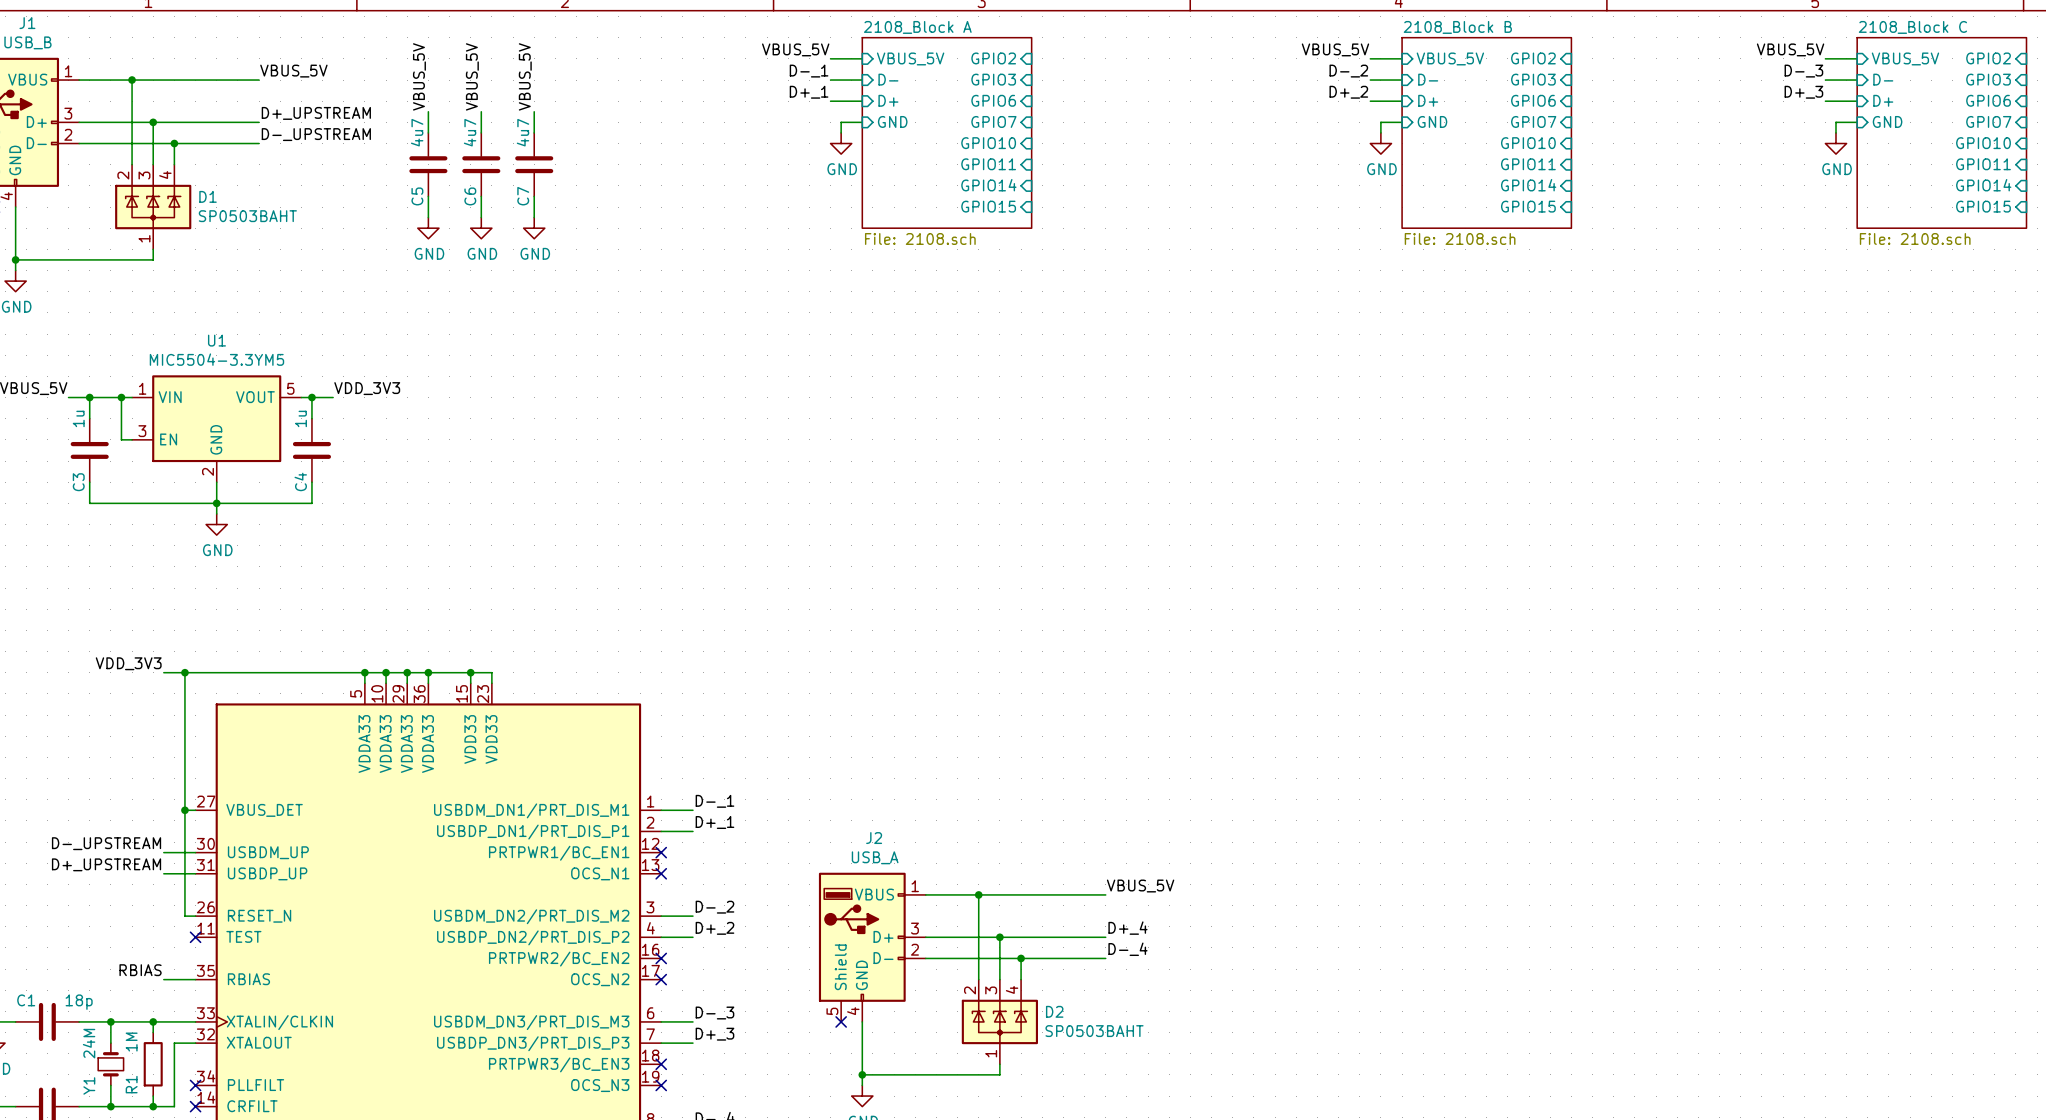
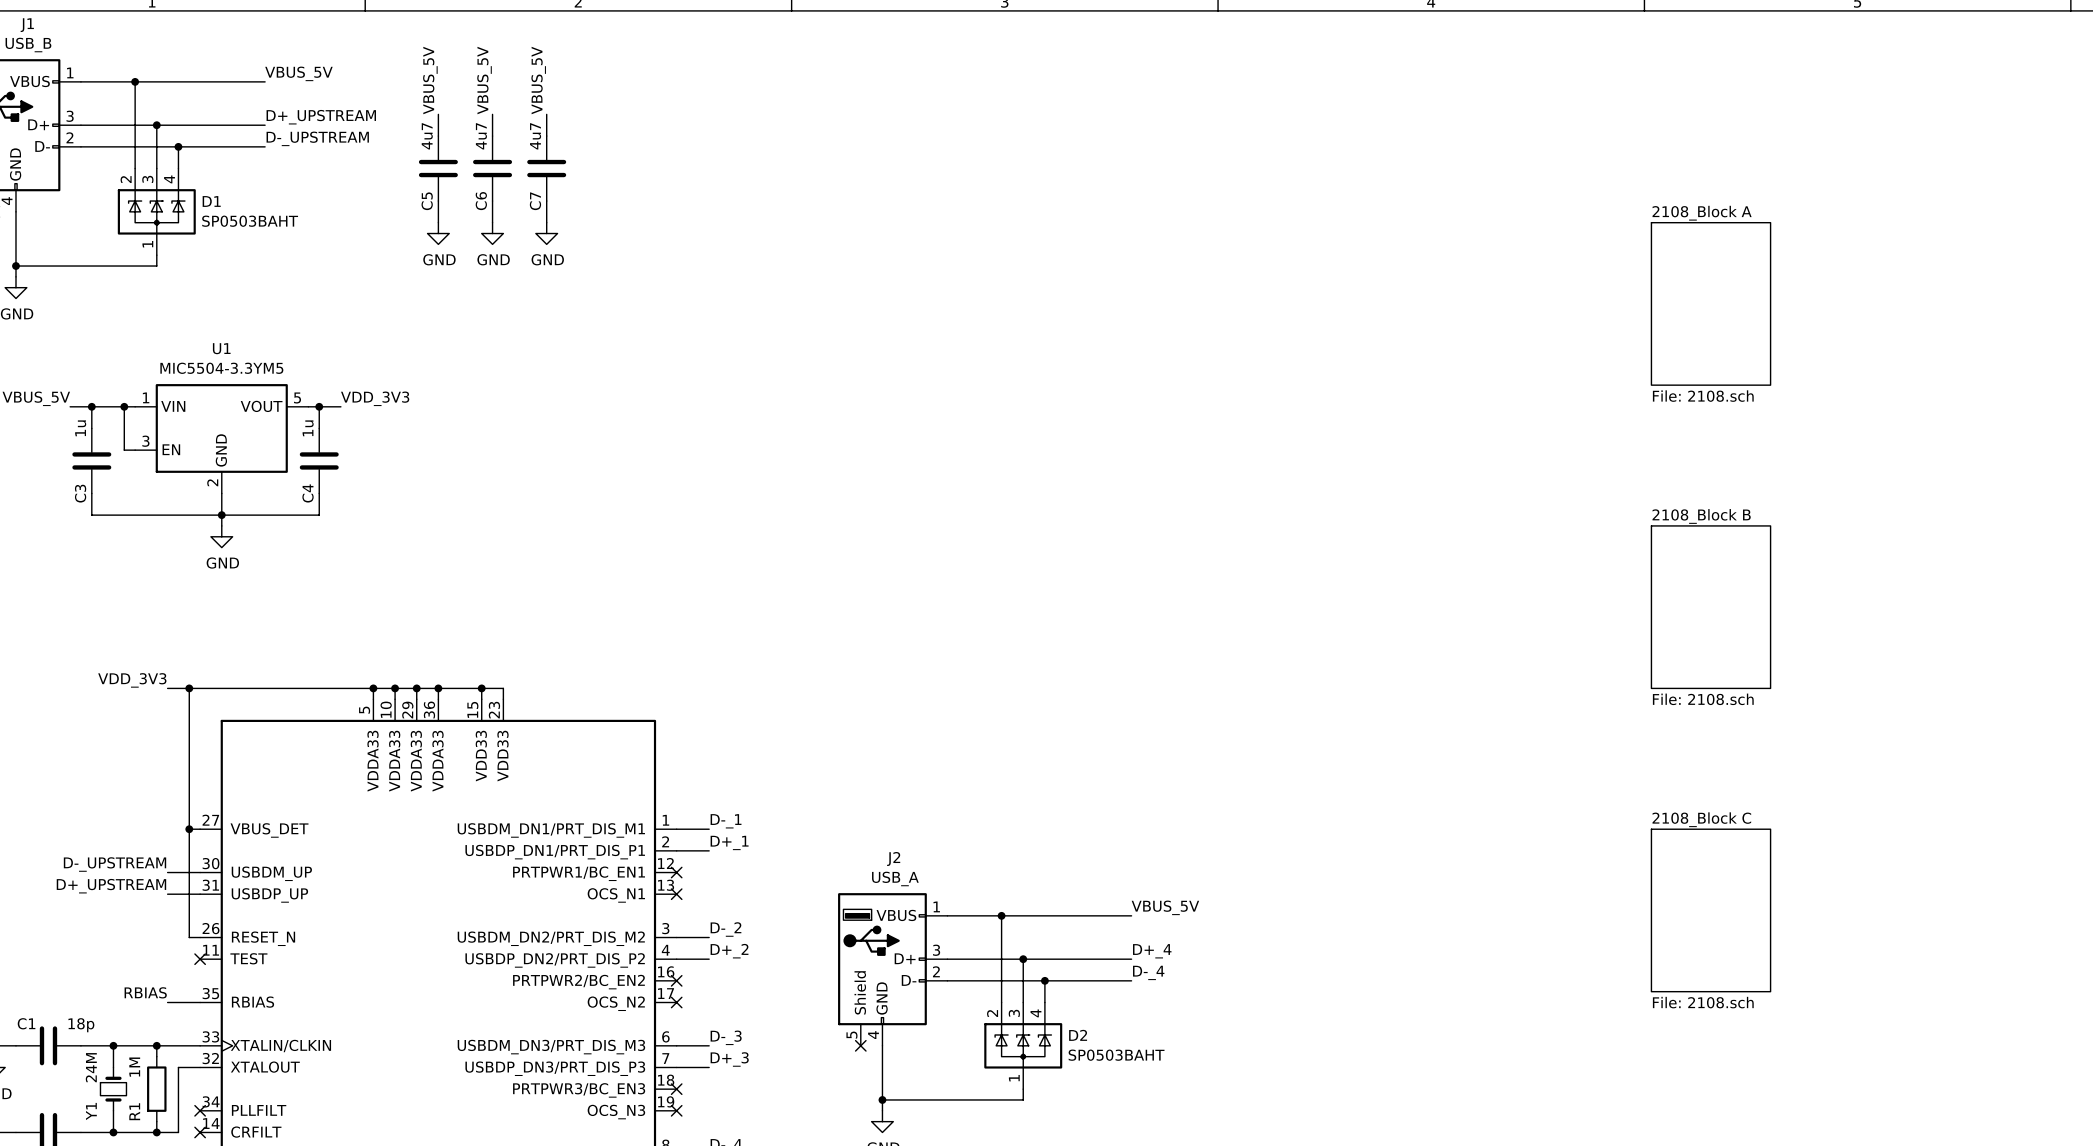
sheet 2108_Block A name position: 2108_Block A (917, 27) -> 2108_Block A (1702, 213)
sheet 2108_Block B name position: 2108_Block B (1457, 27) -> 2108_Block B (1701, 516)
sheet 2108_Block C name position: 2108_Block C (1912, 27) -> 2108_Block C (1701, 819)
sheet 2108_Block A shape: [862, 37, 1032, 229] -> [1651, 222, 1771, 386]
sheet 2108_Block B shape: [1402, 37, 1572, 229] -> [1651, 525, 1771, 689]
sheet 2108_Block C shape: [1857, 37, 2027, 229] -> [1651, 829, 1771, 992]
label: VBUS_5V (795, 49) -> none
label: VBUS_5V (1335, 49) -> none
label: VBUS_5V (1790, 49) -> none
wire: (830, 58) (862, 58) -> none
sheet pin: VBUS_5V (910, 58) -> none
sheet pin: GPIO2 (993, 58) -> none
wire: (1370, 58) (1402, 58) -> none
sheet pin: VBUS_5V (1450, 58) -> none
sheet pin: GPIO2 (1533, 58) -> none
wire: (1825, 58) (1857, 58) -> none
sheet pin: VBUS_5V (1905, 58) -> none
sheet pin: GPIO2 (1988, 58) -> none
label: D-_1 (809, 71) -> none
label: D-_2 (1348, 71) -> none
label: D-_3 (1803, 71) -> none
sheet pin: D- (888, 79) -> none
sheet pin: GPIO3 (993, 79) -> none
sheet pin: D- (1428, 79) -> none
sheet pin: GPIO3 (1533, 79) -> none
sheet pin: D- (1883, 79) -> none
sheet pin: GPIO3 (1988, 79) -> none
wire: (830, 80) (862, 80) -> none
wire: (1370, 80) (1402, 80) -> none
wire: (1825, 80) (1857, 80) -> none
label: D+_1 (809, 92) -> none
label: D+_2 (1348, 92) -> none
label: D+_3 (1803, 92) -> none
sheet pin: D+ (888, 100) -> none
sheet pin: GPIO6 (993, 100) -> none
sheet pin: D+ (1428, 100) -> none
sheet pin: GPIO6 (1533, 100) -> none
sheet pin: D+ (1883, 100) -> none
sheet pin: GPIO6 (1988, 100) -> none
wire: (830, 101) (862, 101) -> none
wire: (1370, 101) (1402, 101) -> none
wire: (1825, 101) (1857, 101) -> none
sheet pin: GND (892, 121) -> none
sheet pin: GPIO7 (993, 121) -> none
sheet pin: GND (1432, 121) -> none
sheet pin: GPIO7 (1533, 121) -> none
sheet pin: GND (1887, 121) -> none
sheet pin: GPIO7 (1988, 121) -> none
wire: (862, 122) (841, 122) (841, 132) -> none
wire: (1402, 122) (1380, 122) (1380, 132) -> none
wire: (1857, 122) (1835, 122) (1835, 132) -> none
power symbol: GND (841, 143) -> none
sheet pin: GPIO10 (988, 143) -> none
power symbol: GND (1380, 143) -> none
sheet pin: GPIO10 (1528, 143) -> none
power symbol: GND (1835, 143) -> none
sheet pin: GPIO10 (1983, 143) -> none
sheet pin: GPIO11 (988, 164) -> none
sheet pin: GPIO11 (1528, 164) -> none
sheet pin: GPIO11 (1983, 164) -> none
sheet pin: GPIO14 (988, 185) -> none
sheet pin: GPIO14 (1528, 185) -> none
sheet pin: GPIO14 (1983, 185) -> none
sheet pin: GPIO15 (988, 206) -> none
sheet pin: GPIO15 (1528, 206) -> none
sheet pin: GPIO15 (1983, 206) -> none
sheet 2108_Block A value position: File: 2108.sch (920, 238) -> File: 2108.sch (1703, 396)
sheet 2108_Block B value position: File: 2108.sch (1460, 238) -> File: 2108.sch (1703, 699)
sheet 2108_Block C value position: File: 2108.sch (1915, 238) -> File: 2108.sch (1703, 1002)

